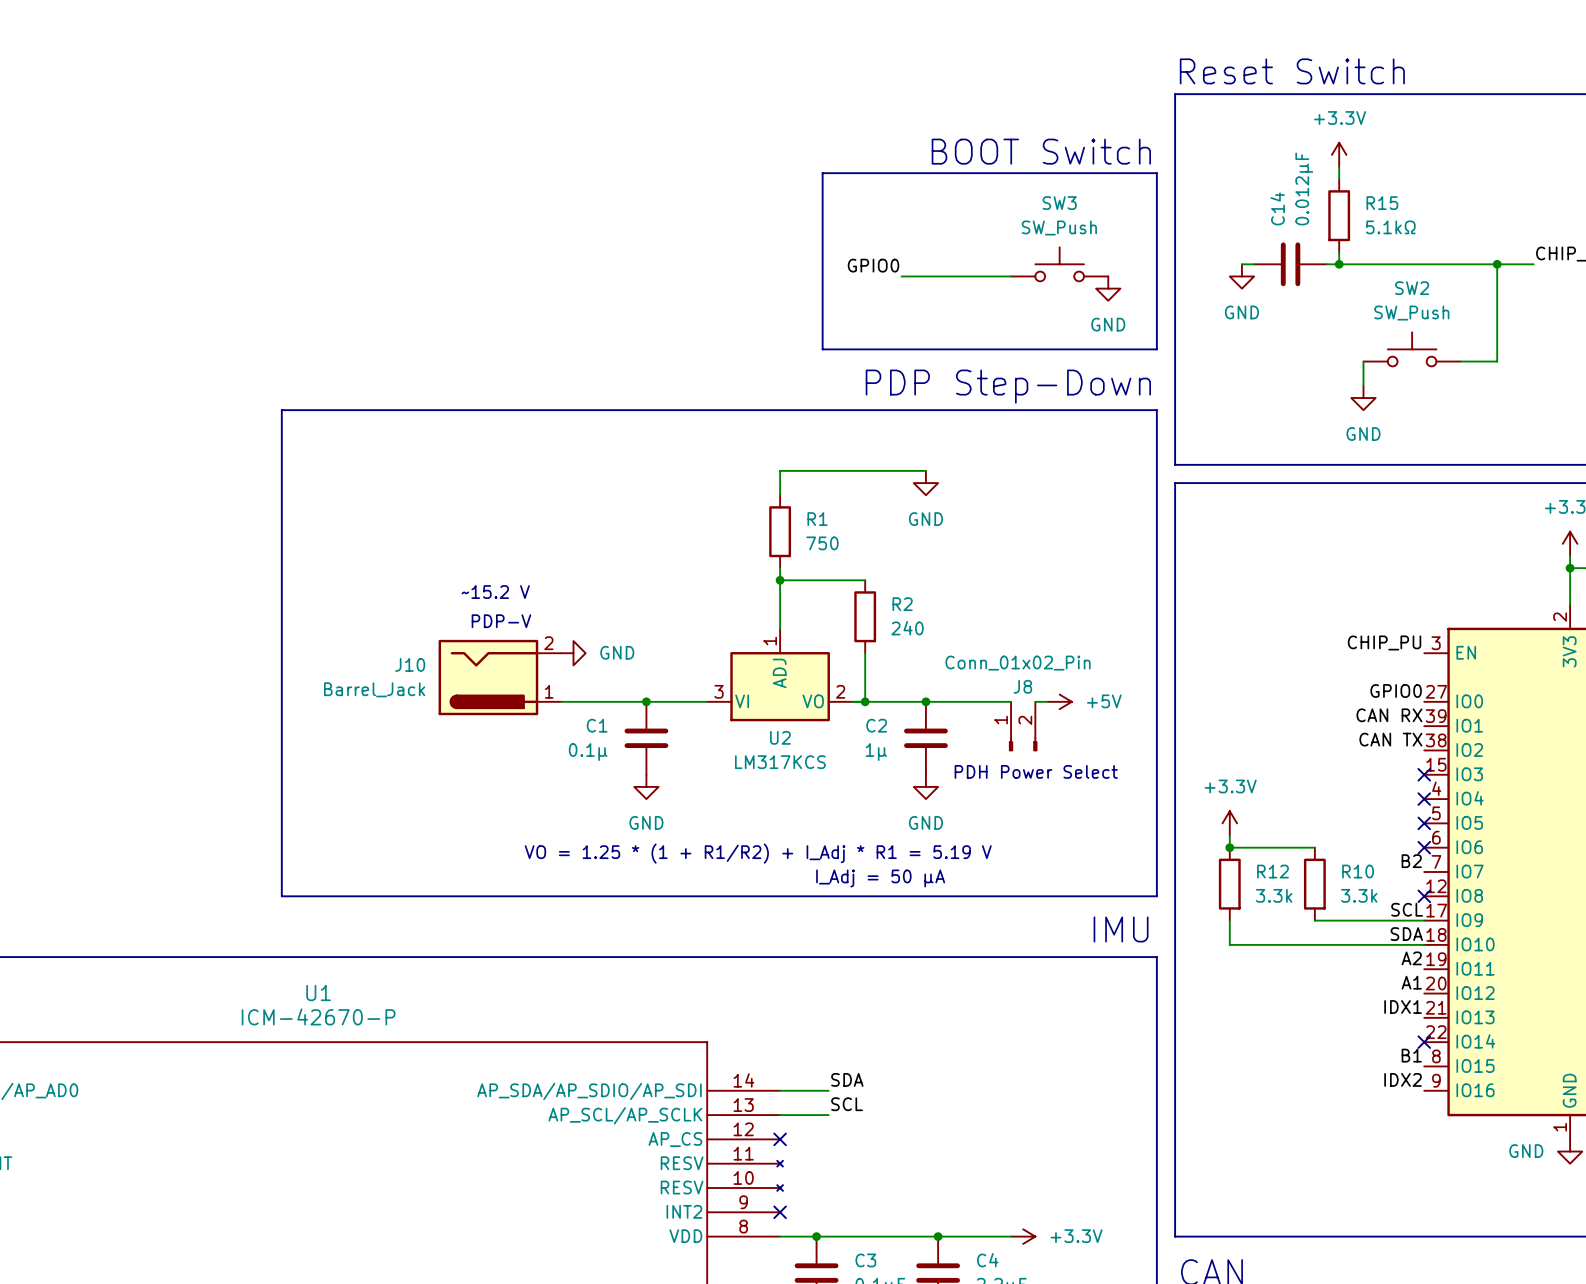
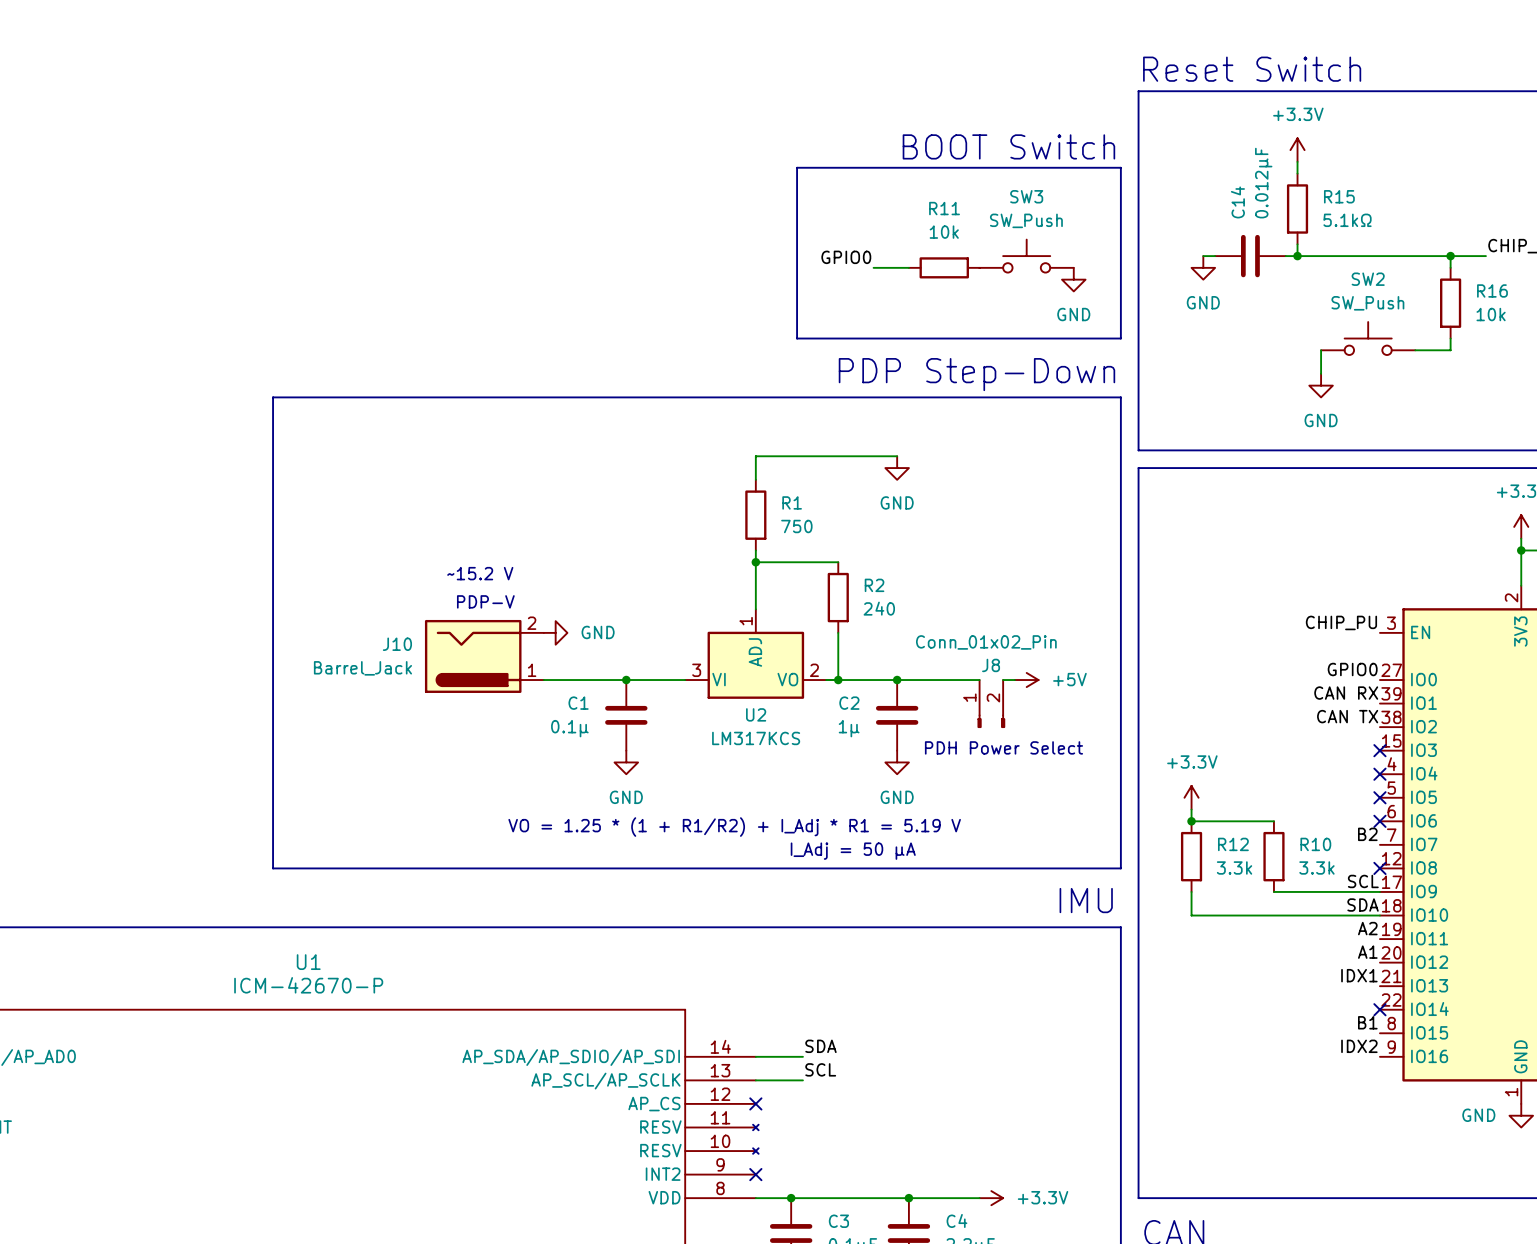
wire: (938, 276) (1011, 276) -> none
R11: none -> 10k (944, 267)
wire: (1497, 276) (1497, 349) -> none
R16: none -> 10k (1450, 303)

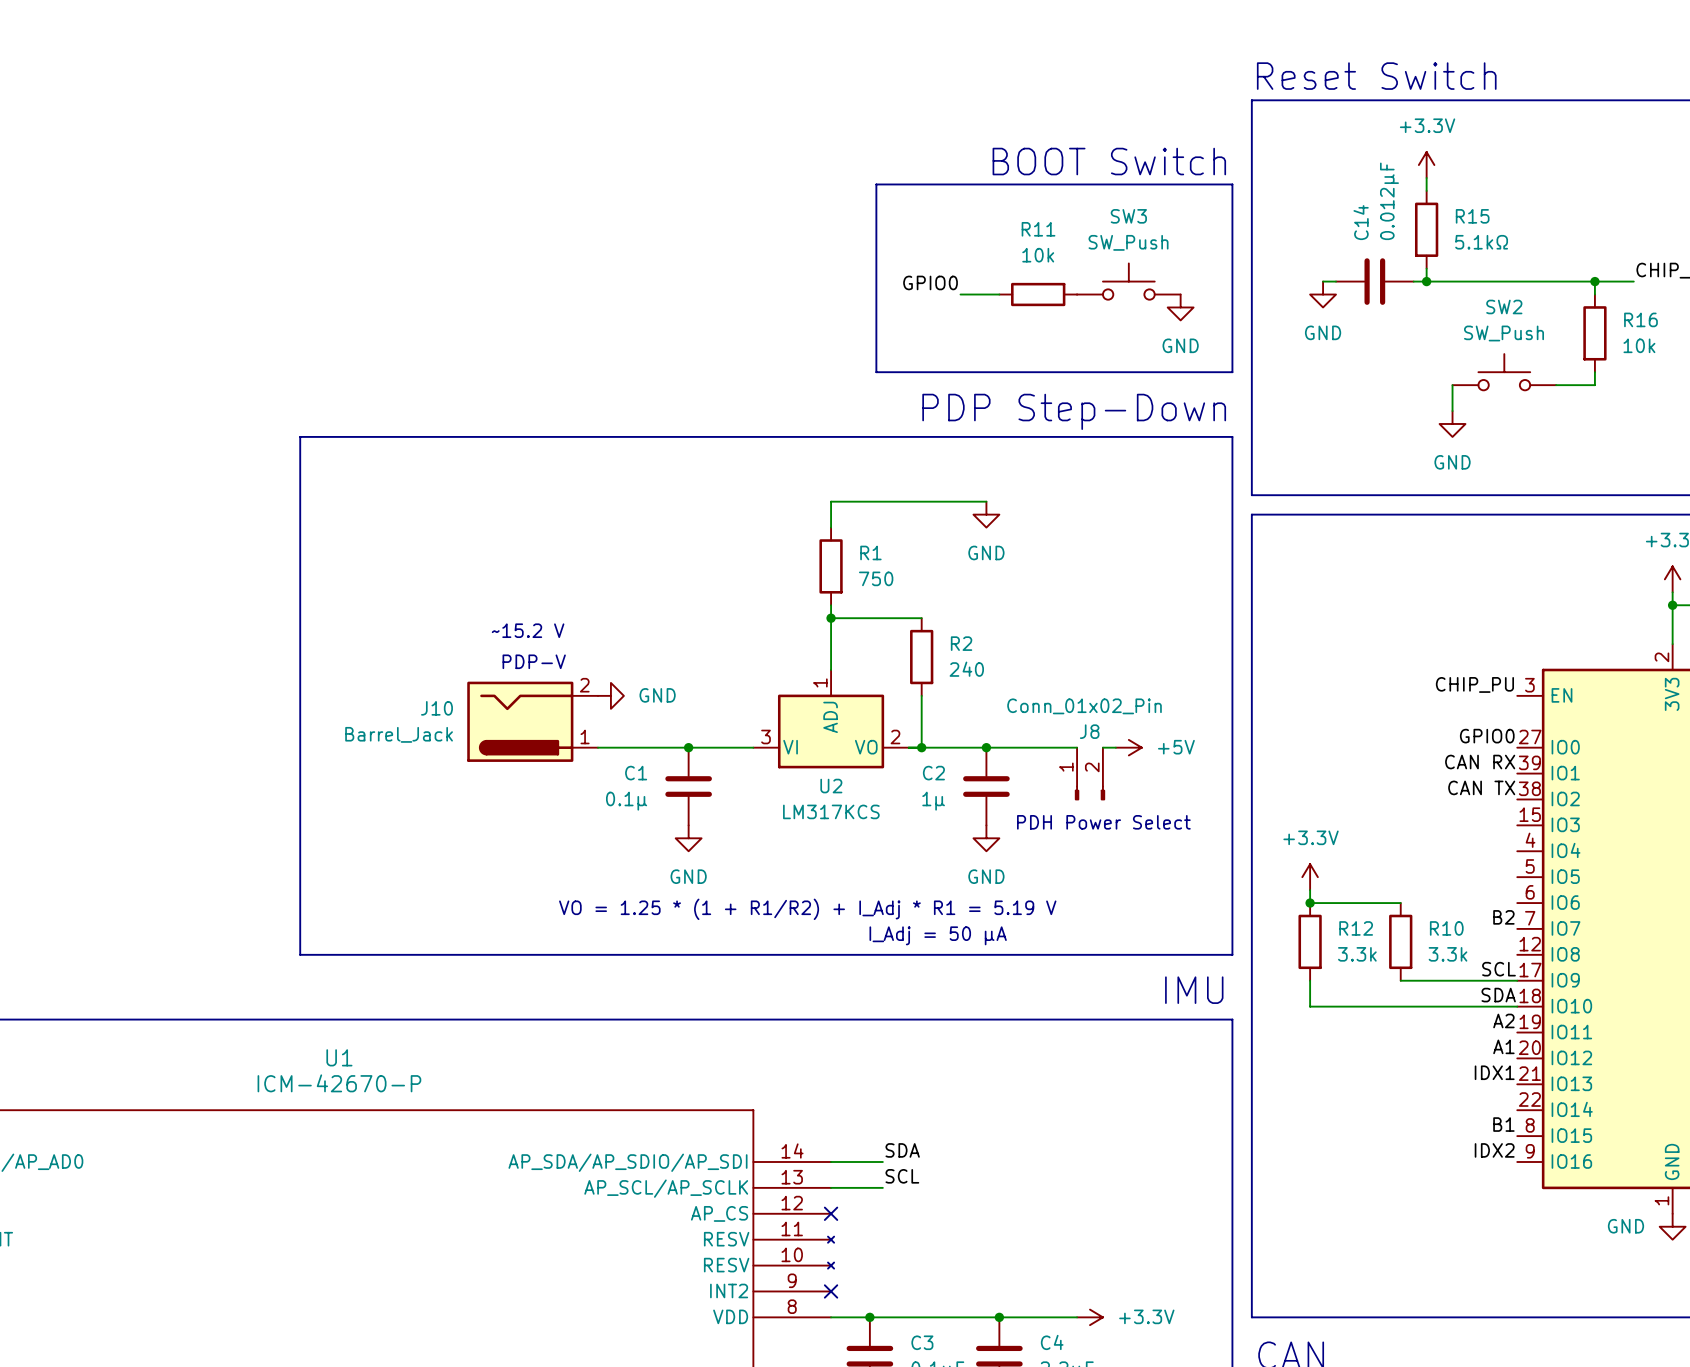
no-connect mark: (1379, 750) -> none
no-connect mark: (1379, 774) -> none
no-connect mark: (1379, 797) -> none
no-connect mark: (1379, 821) -> none
no-connect mark: (1379, 868) -> none
no-connect mark: (1379, 1009) -> none

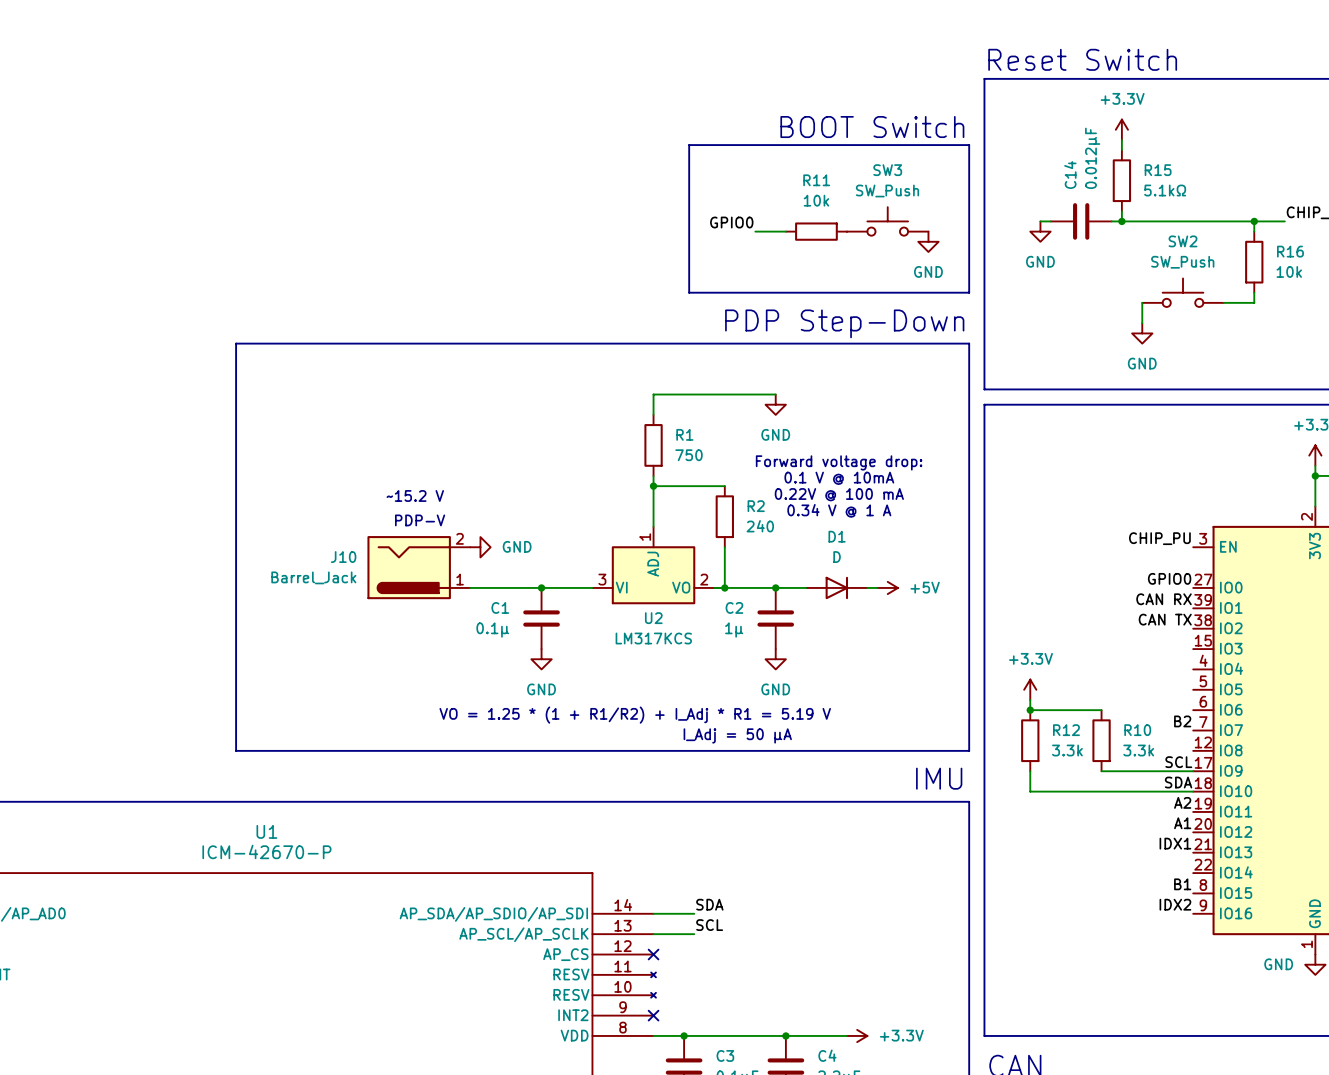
text: none -> Forward voltage drop: (839, 462)
text: none -> 0.1 V @ 10mA (839, 478)
text: none -> 0.22V @ 100 mA (839, 494)
text: none -> 0.34 V @ 1 A (839, 510)
D1: none -> D (836, 587)
J8: Conn_01x02_Pin (1090, 773) -> none
text: PDH Power Select (1103, 822) -> none

